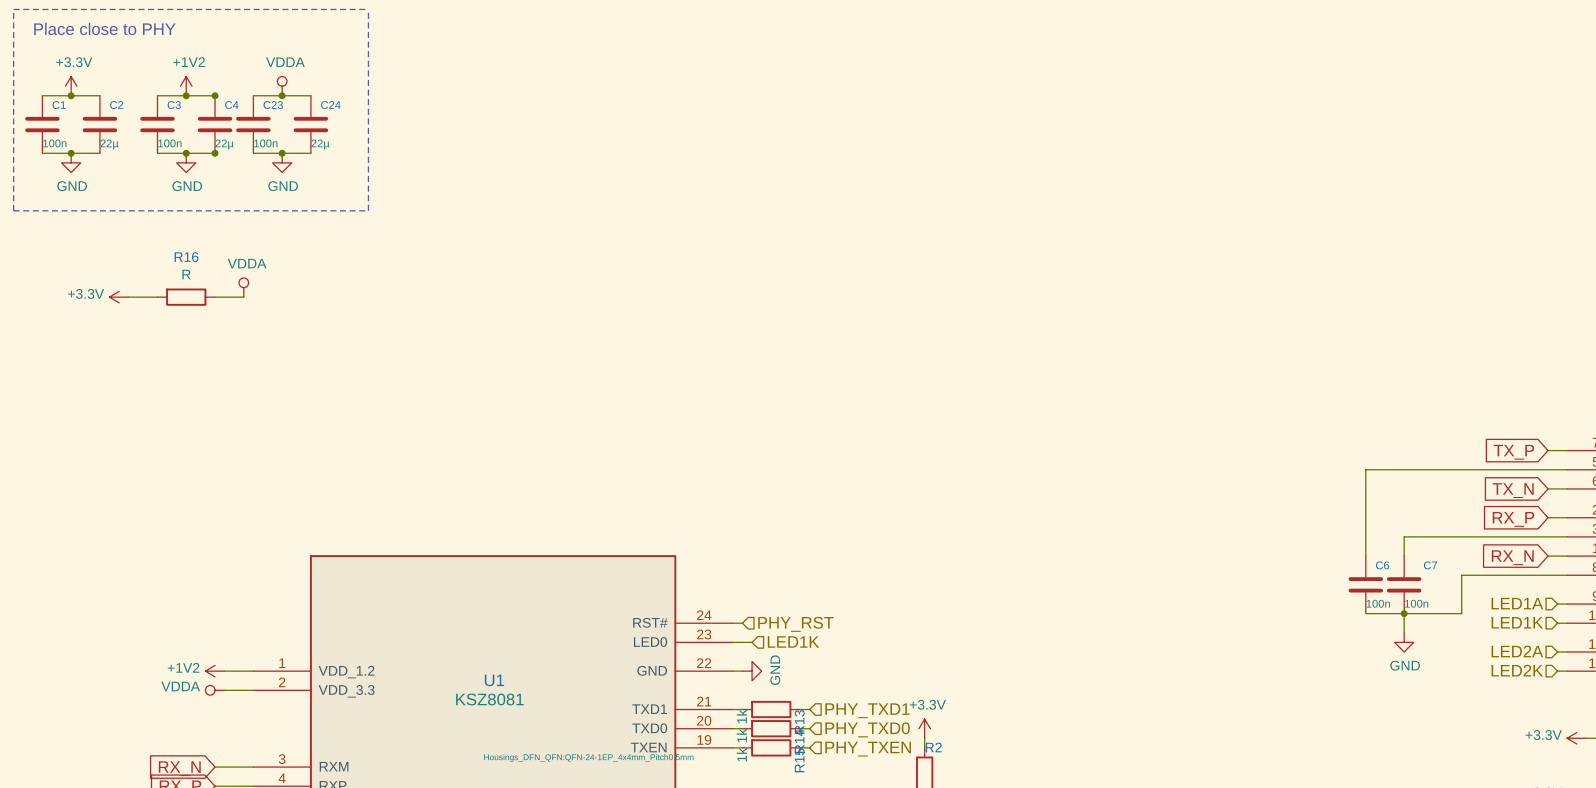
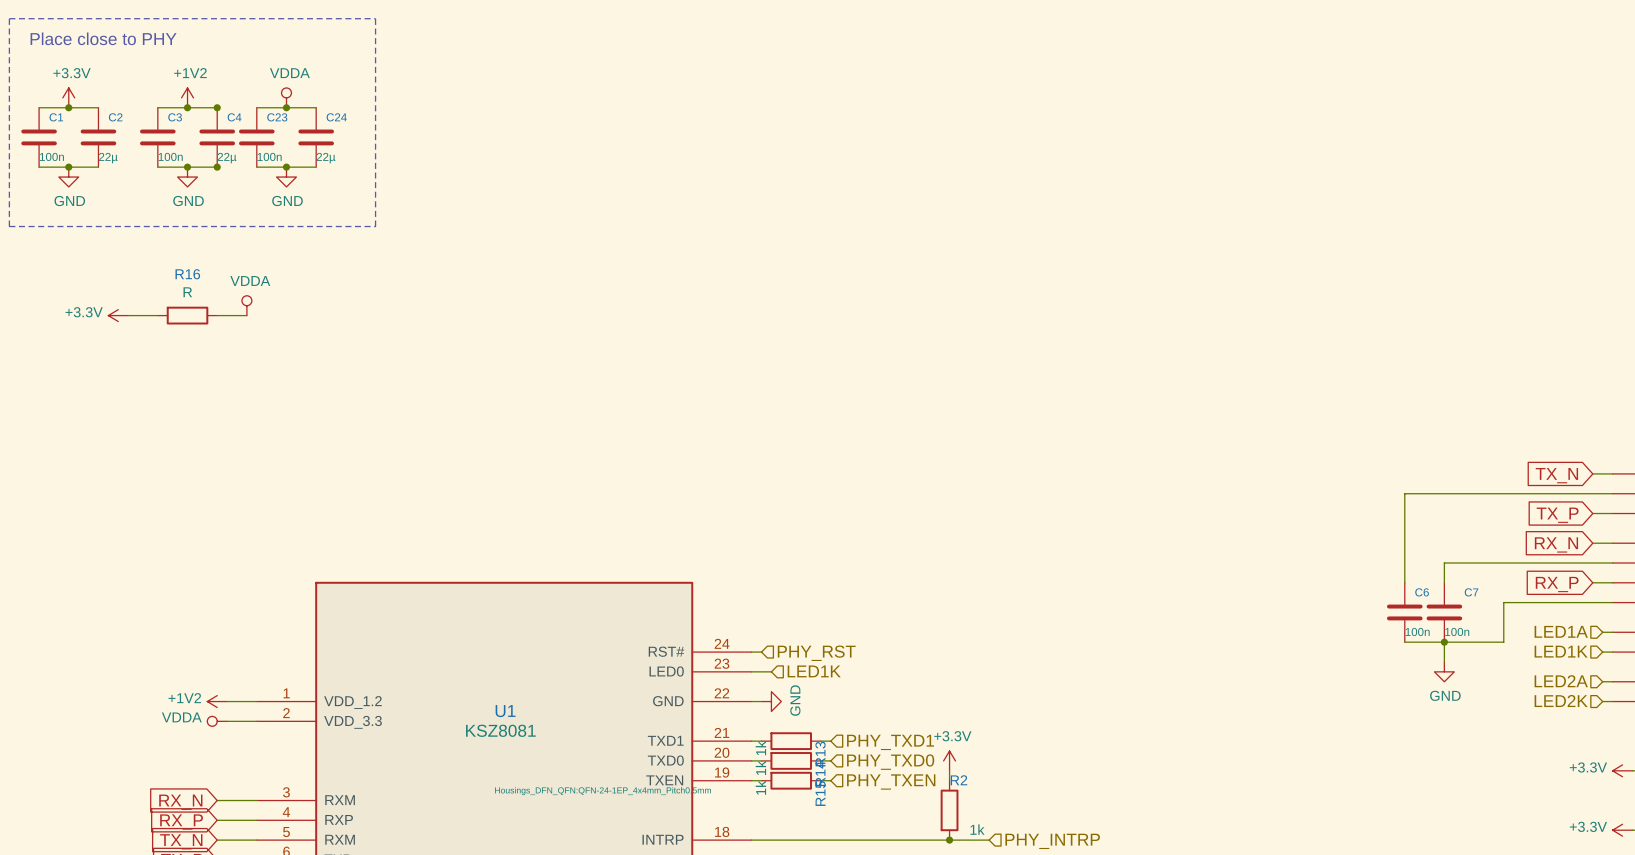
global label: TX_P (1513, 452) -> TX_N (1556, 475)
global label: TX_N (1513, 490) -> TX_P (1557, 515)
global label: RX_P (1513, 519) -> RX_N (1556, 544)
global label: RX_N (1512, 557) -> RX_P (1557, 584)

